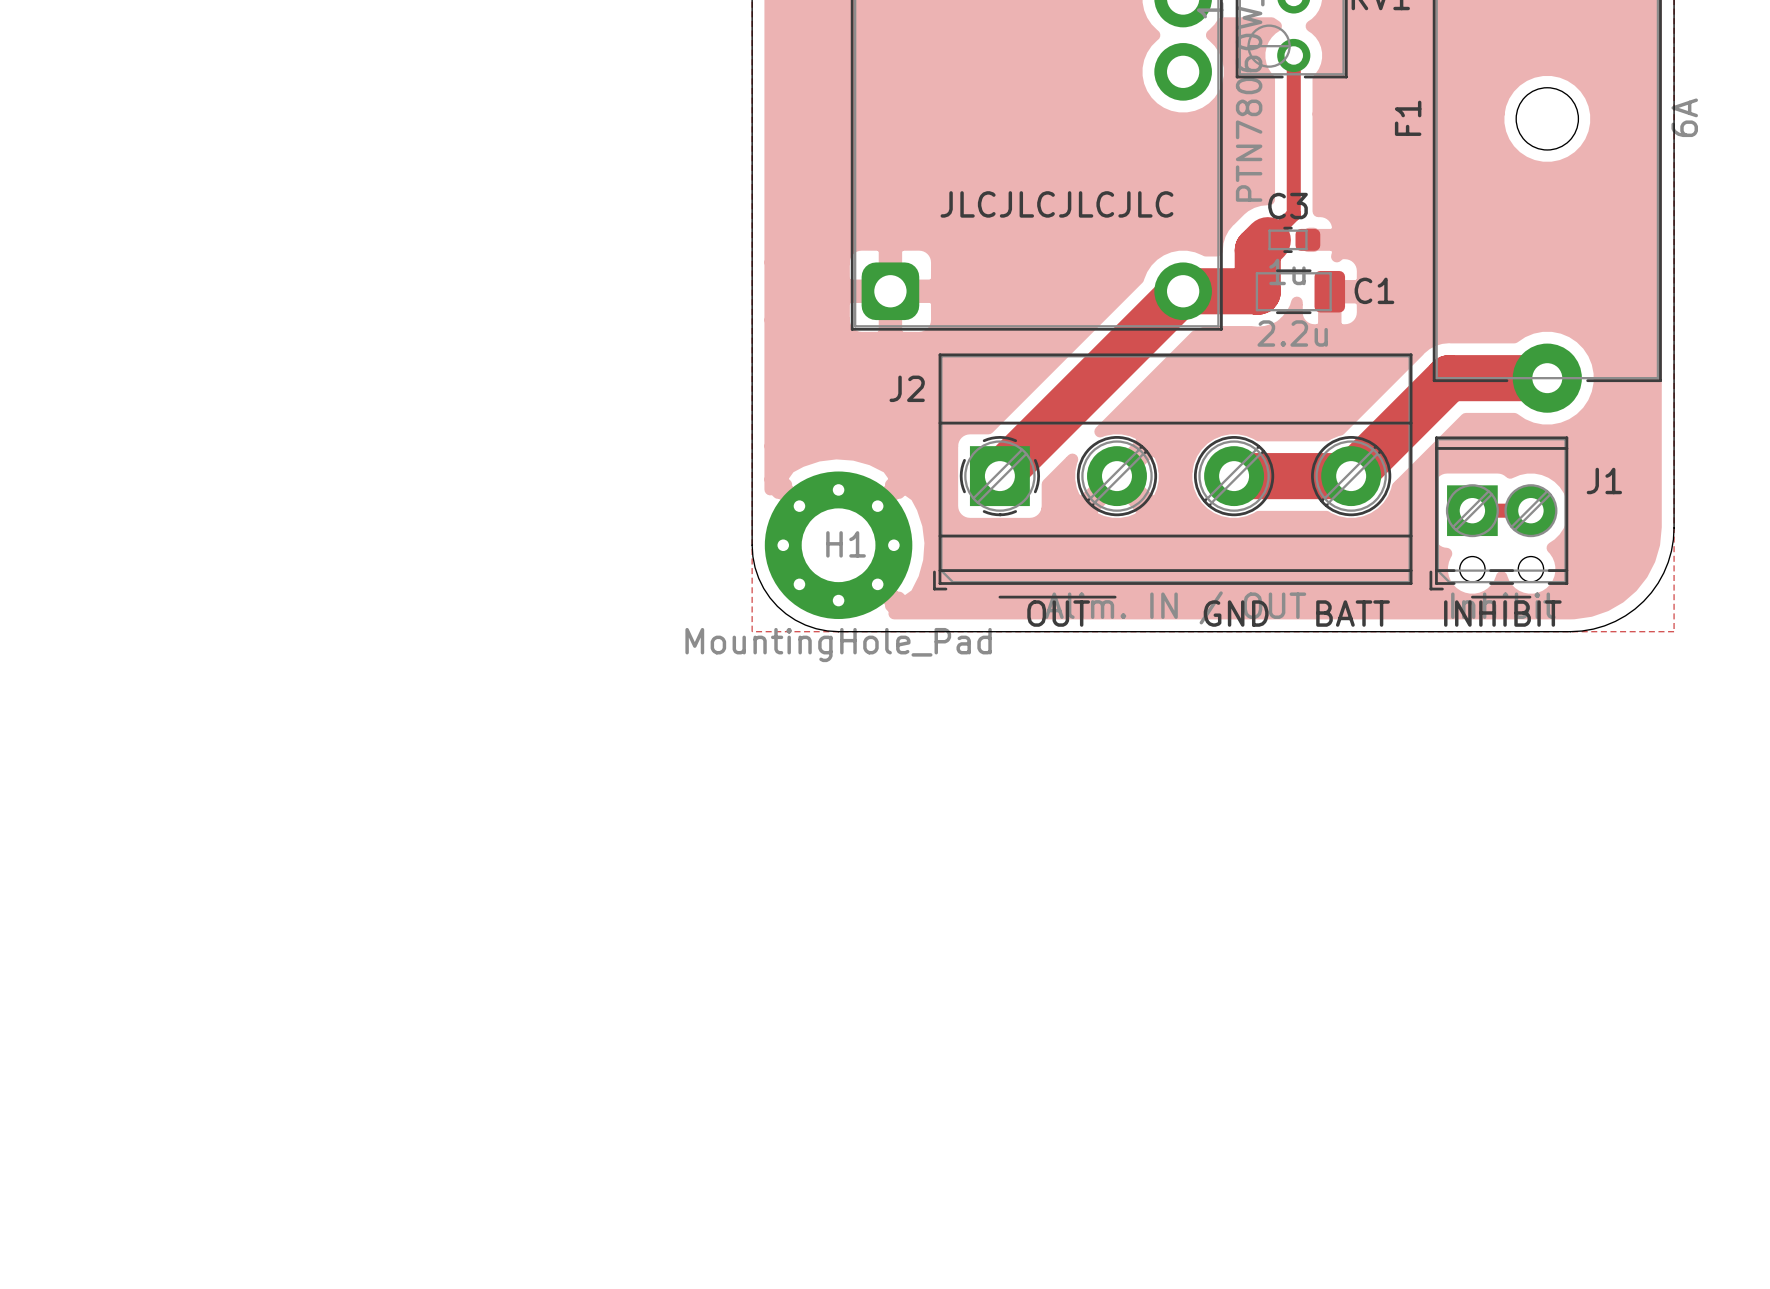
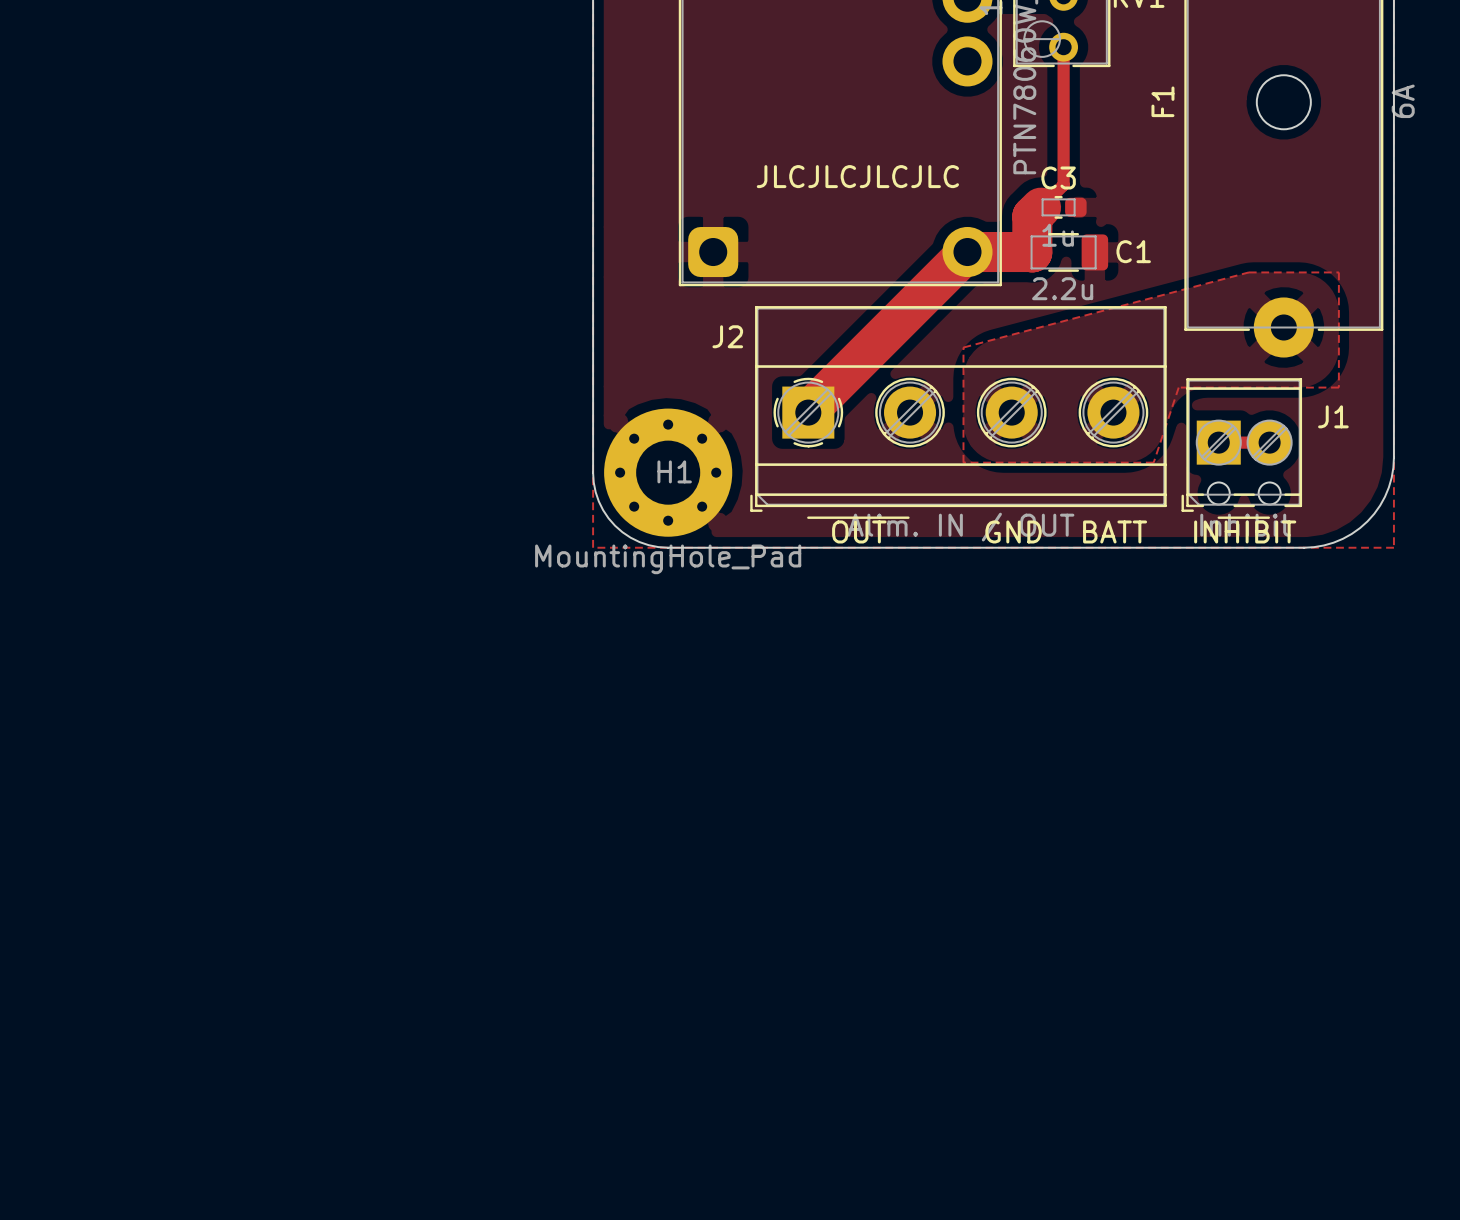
zone outline: none -> (1248, 272) (963, 347) (963, 462) (1153, 462) (1178, 387) (1338, 387) (1338, 272) (1248, 272)
track: (1547, 378) (1449, 378) (1351, 476) (1234, 476) -> none

